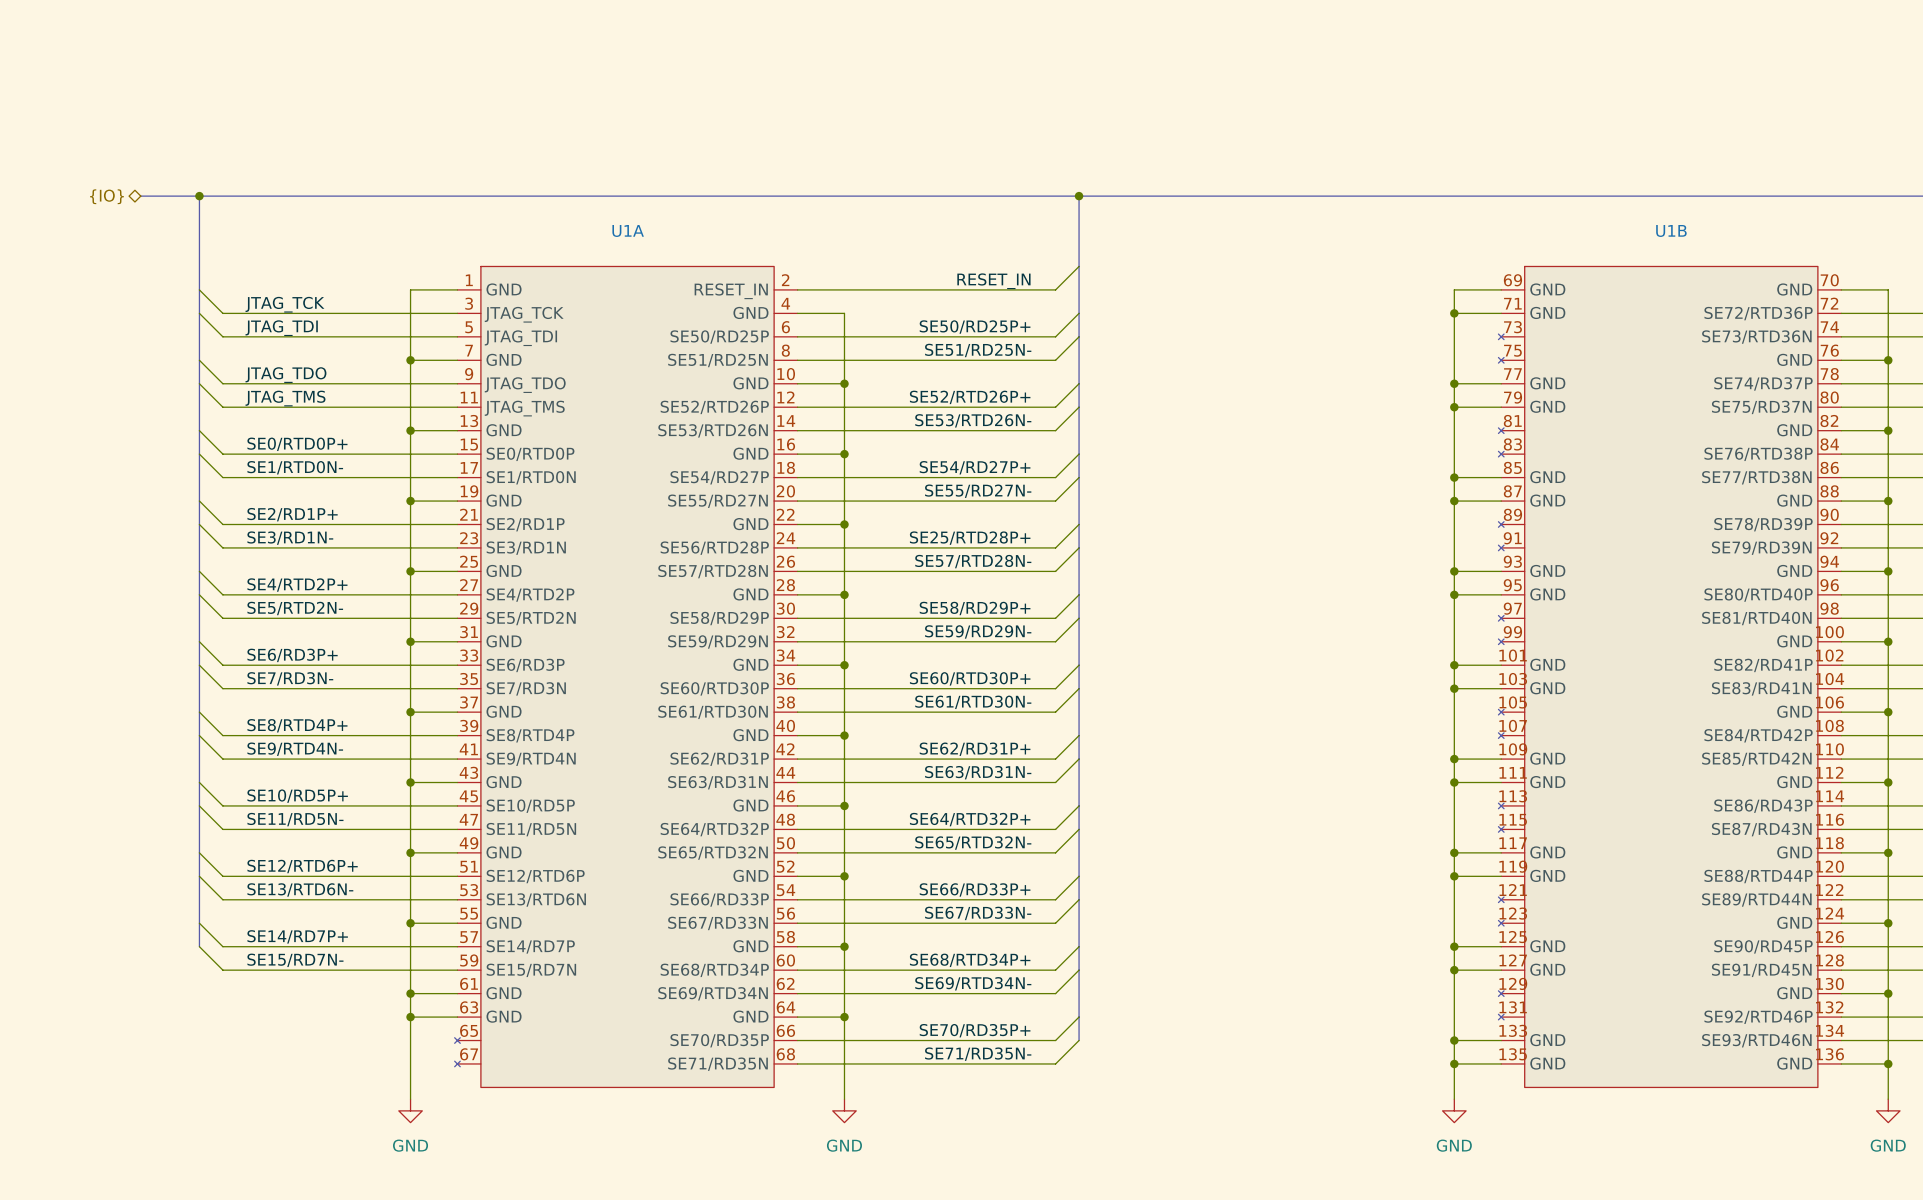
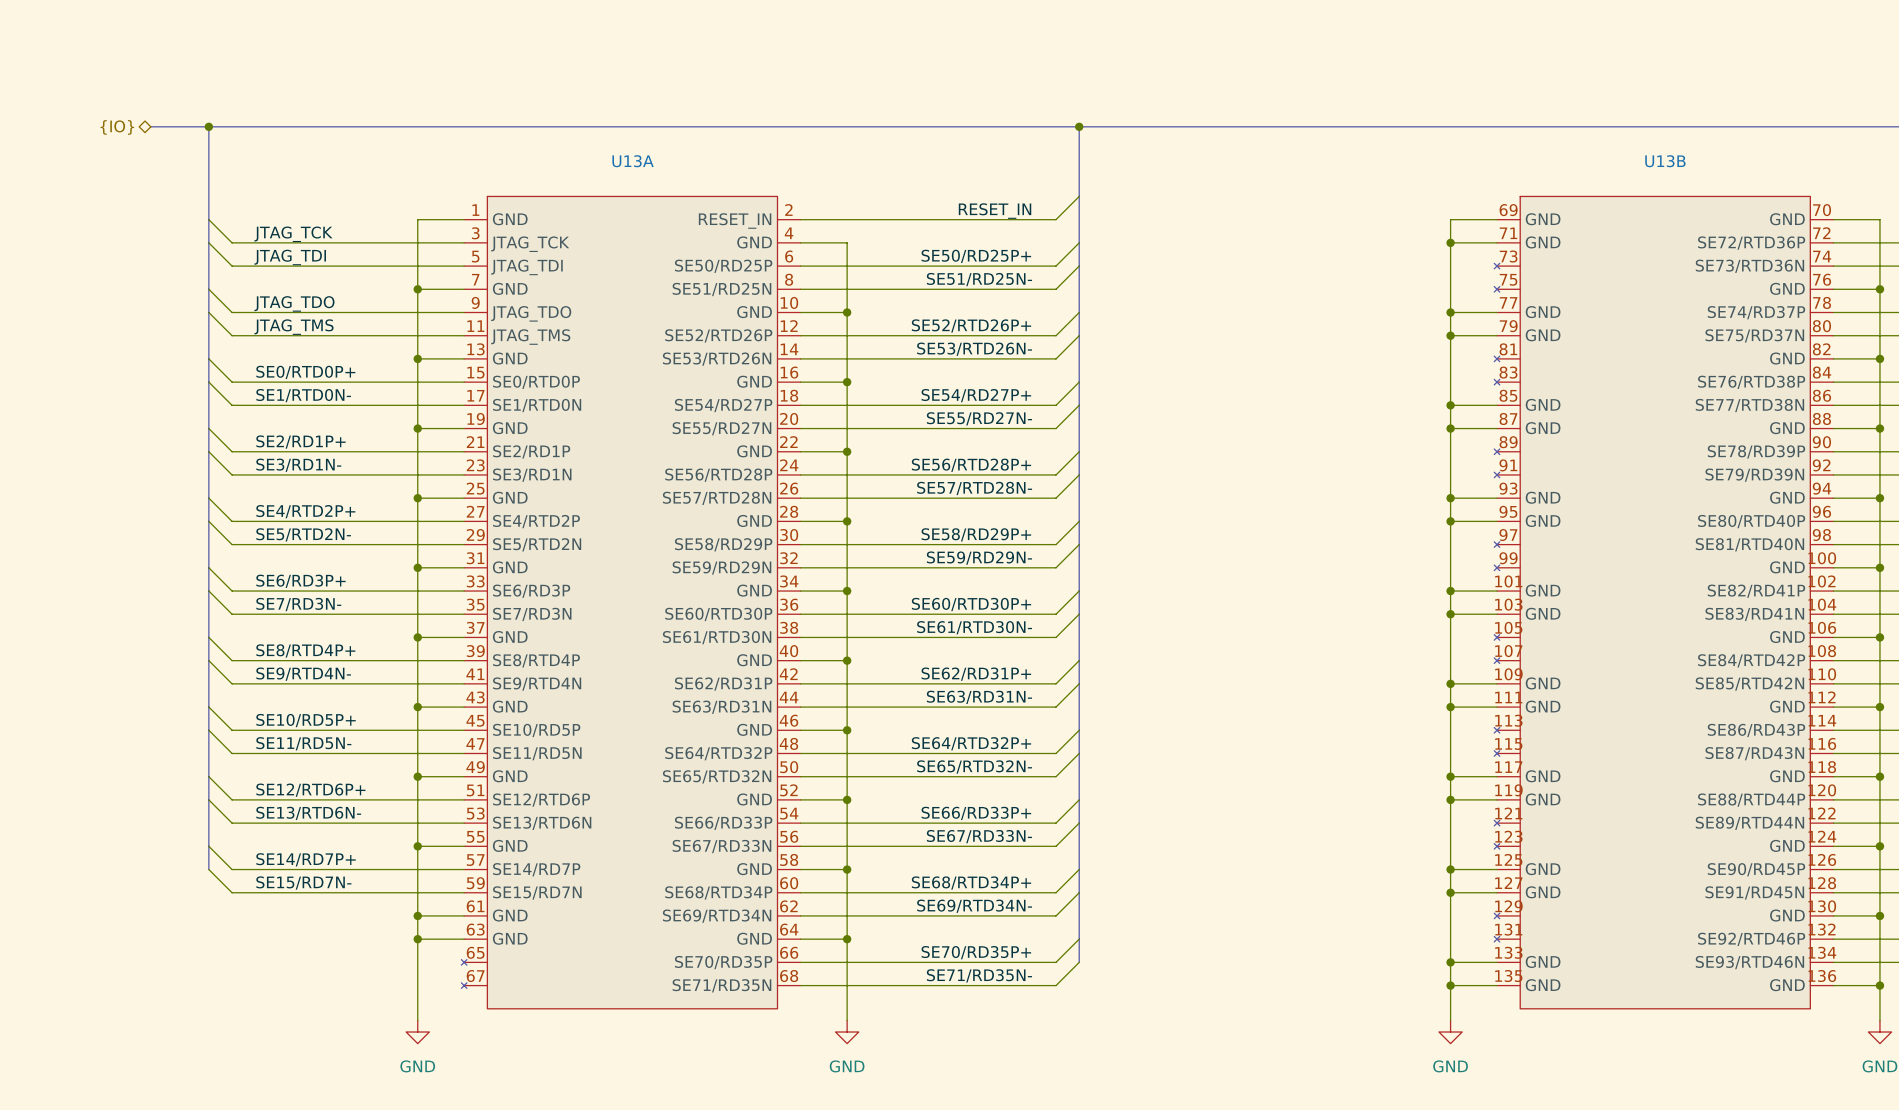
U1A name: U1A (628, 230) -> U13A (633, 161)
U1B name: U1B (1671, 230) -> U13B (1665, 161)
label: SE25/RTD28P+ (970, 538) -> SE56/RTD28P+ (971, 465)

